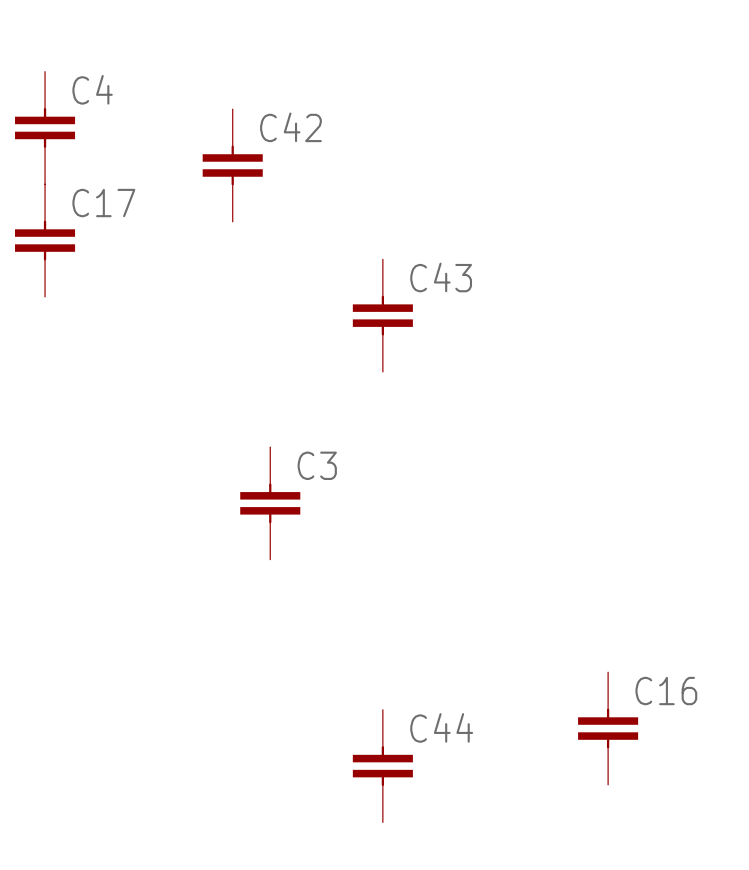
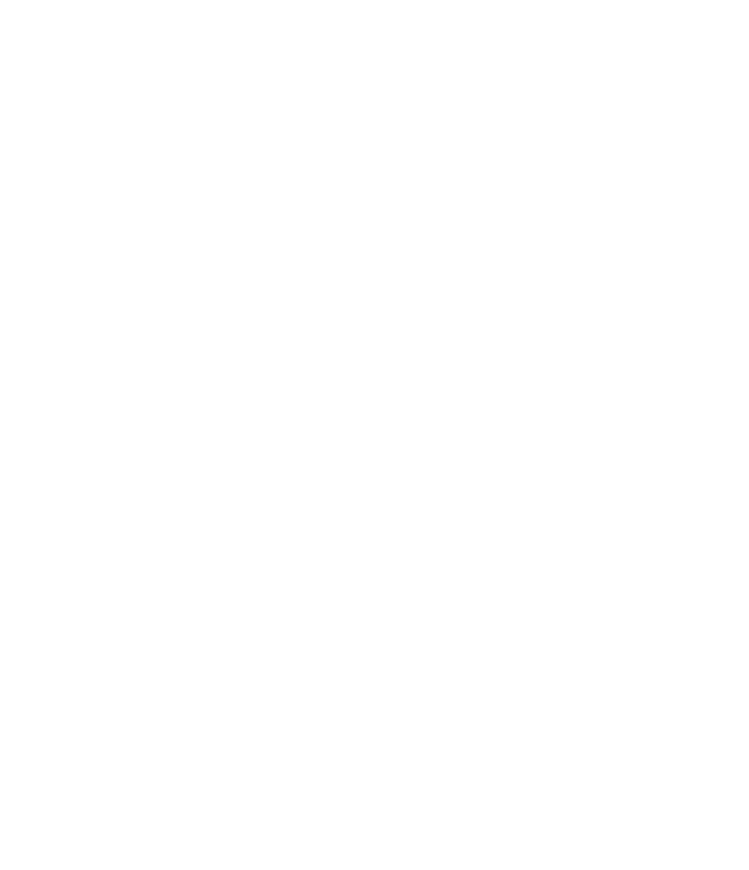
C4: (45, 127) -> none
C42: (232, 165) -> none
C17: (45, 240) -> none
C43: (382, 315) -> none
C3: (270, 503) -> none
C16: (608, 728) -> none
C44: (382, 766) -> none

